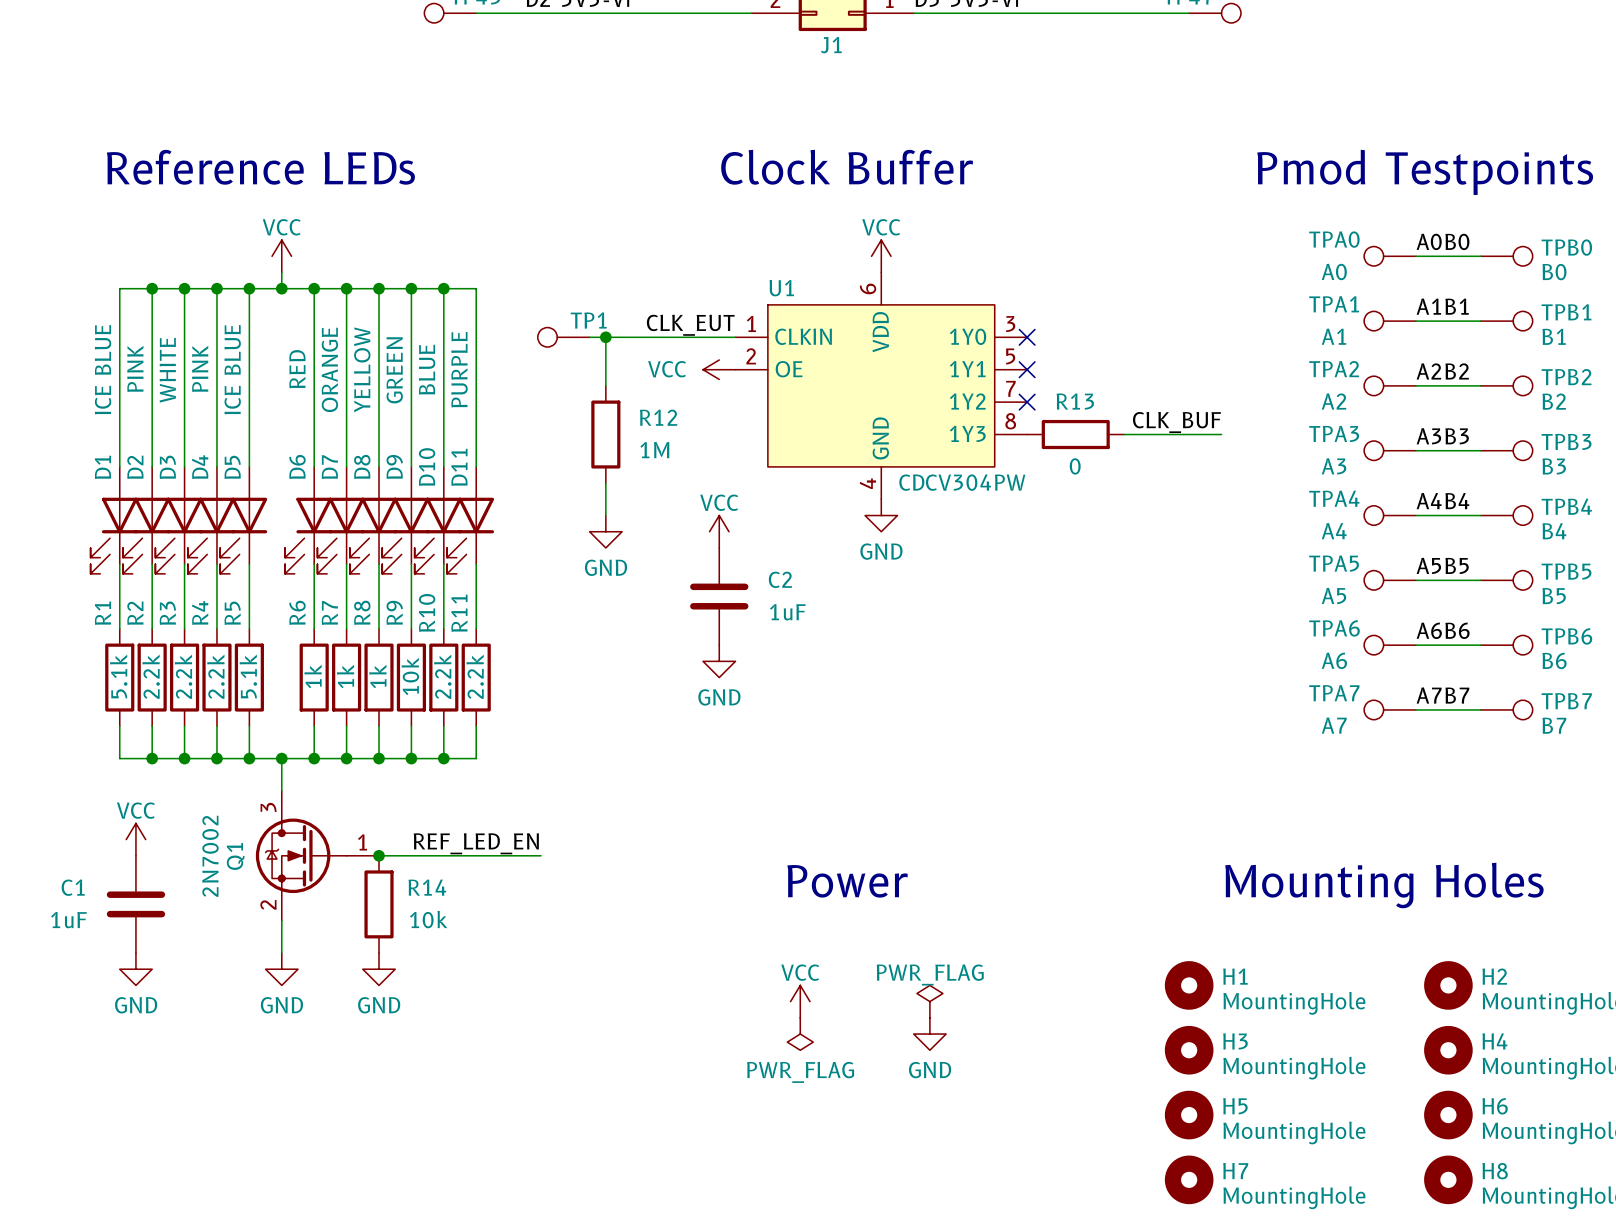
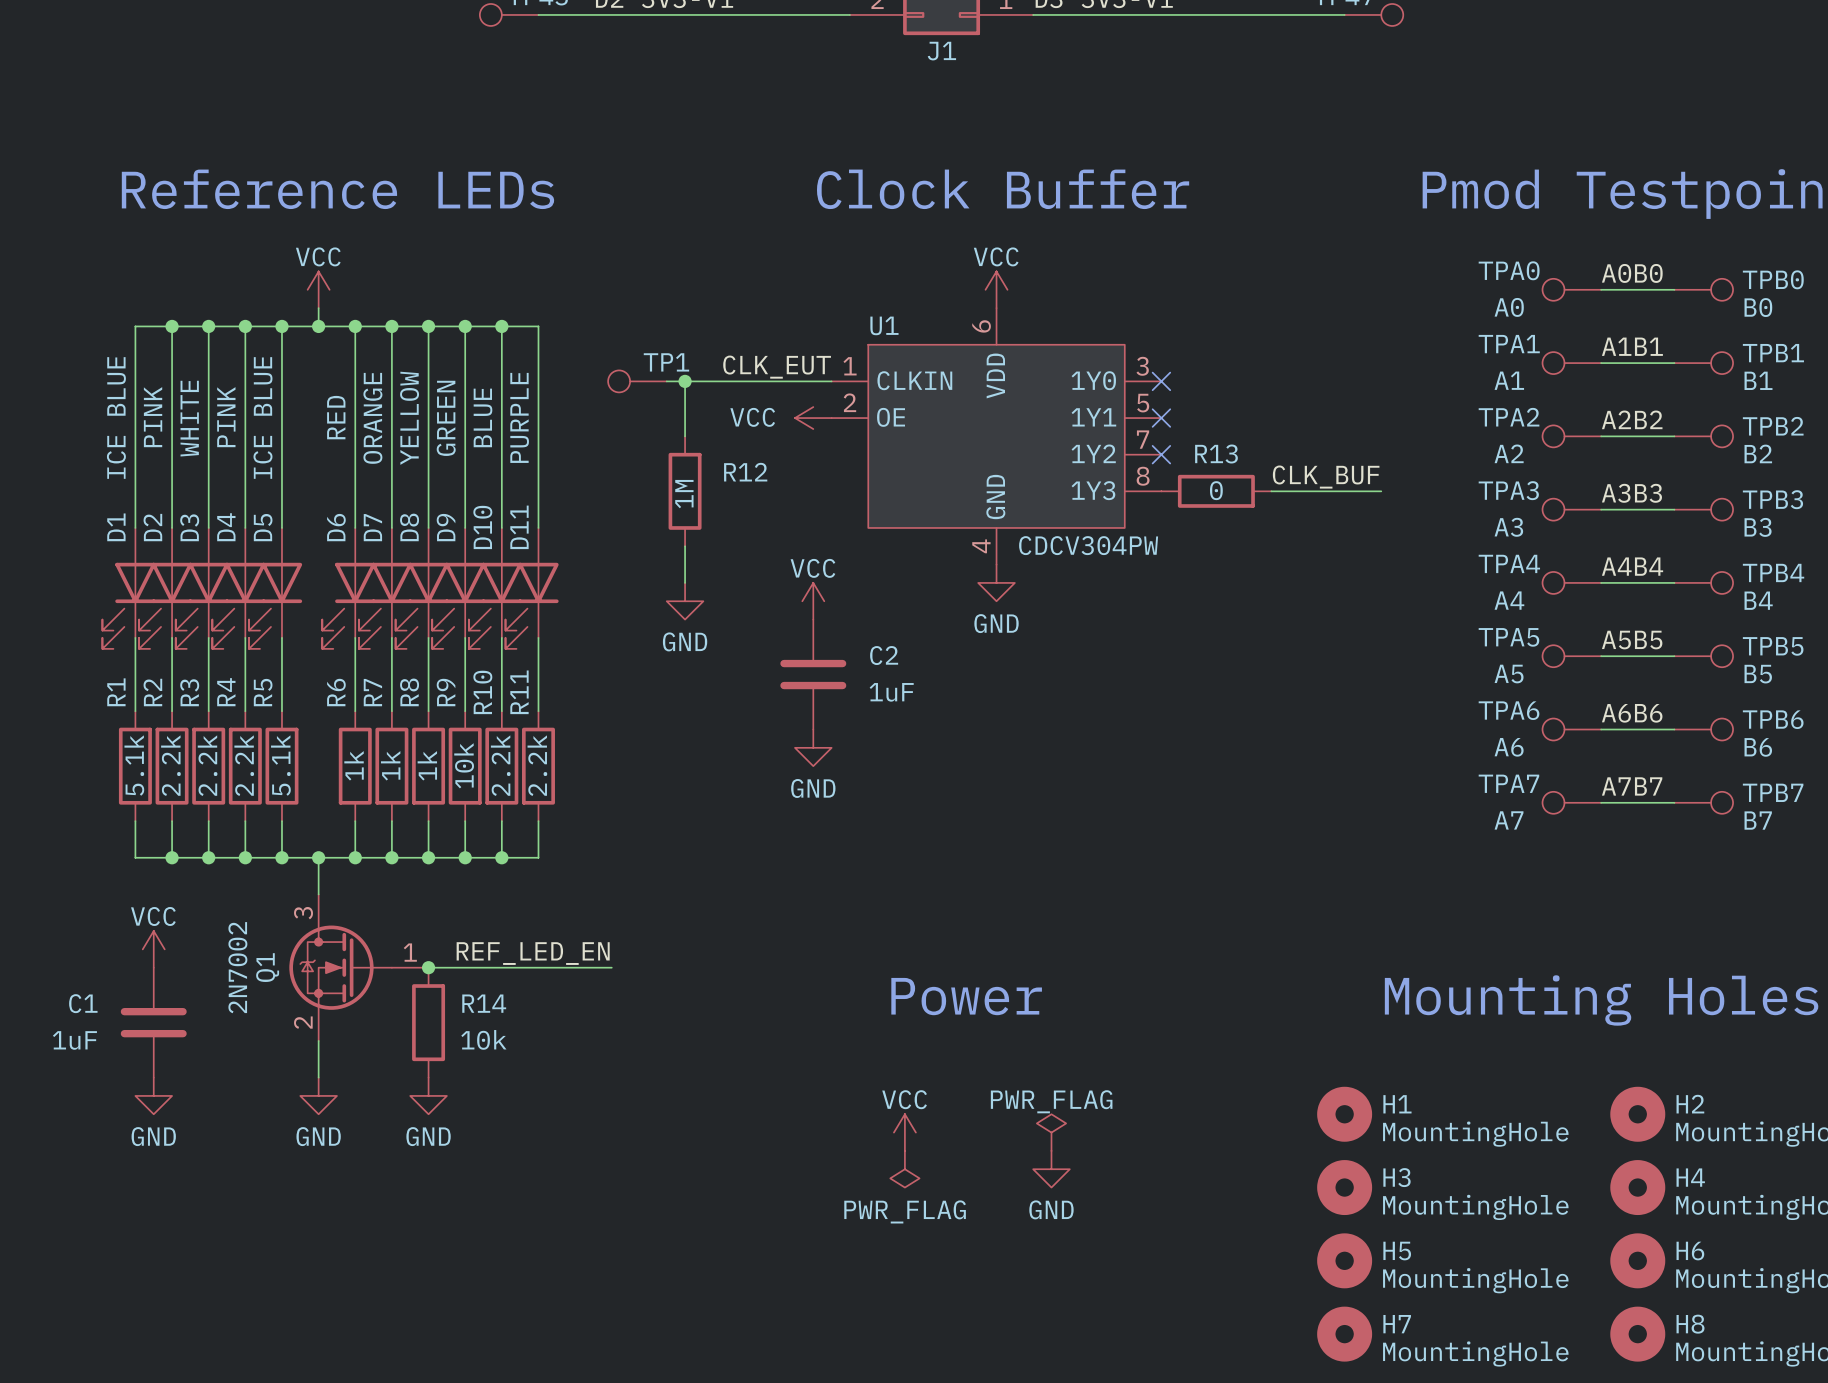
R12 value rotation: 0° (654, 450) -> 90° counterclockwise (684, 494)
R12 value position: 1M (654, 450) -> 1M (684, 494)
R13 value position: 0 (1075, 466) -> 0 (1216, 490)

